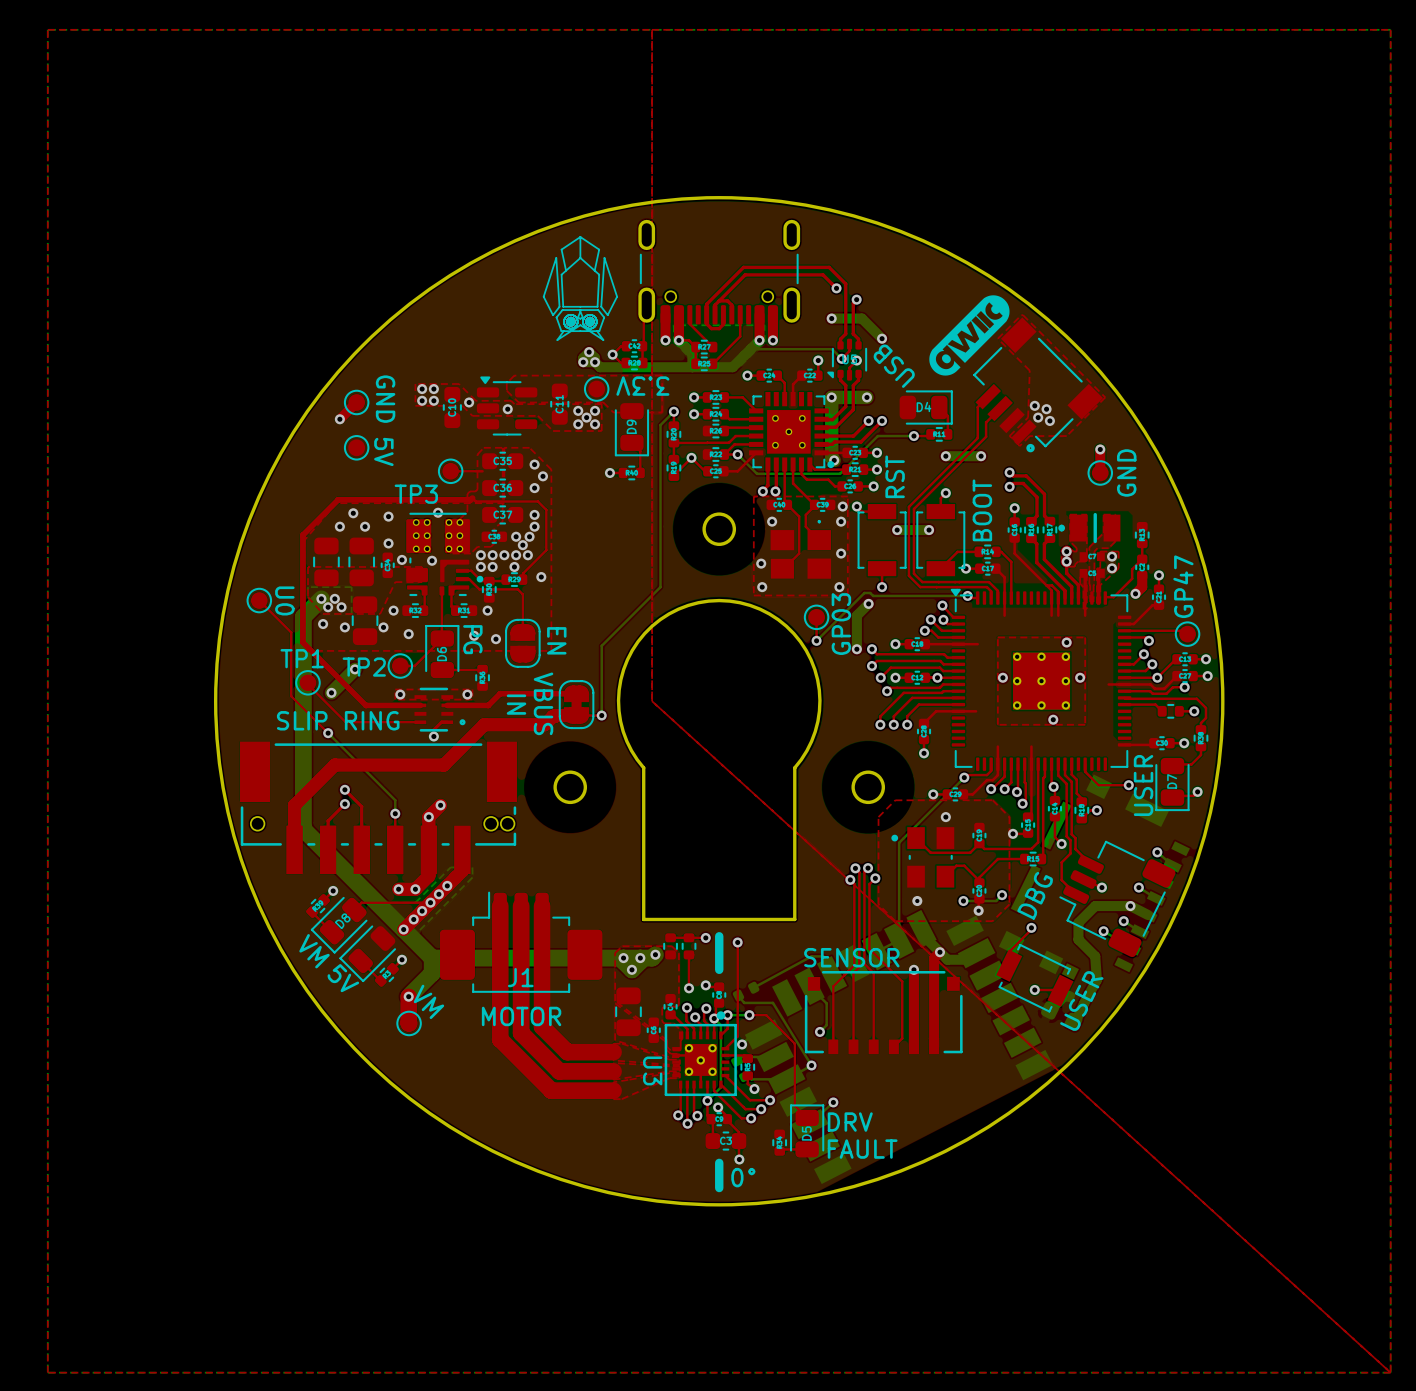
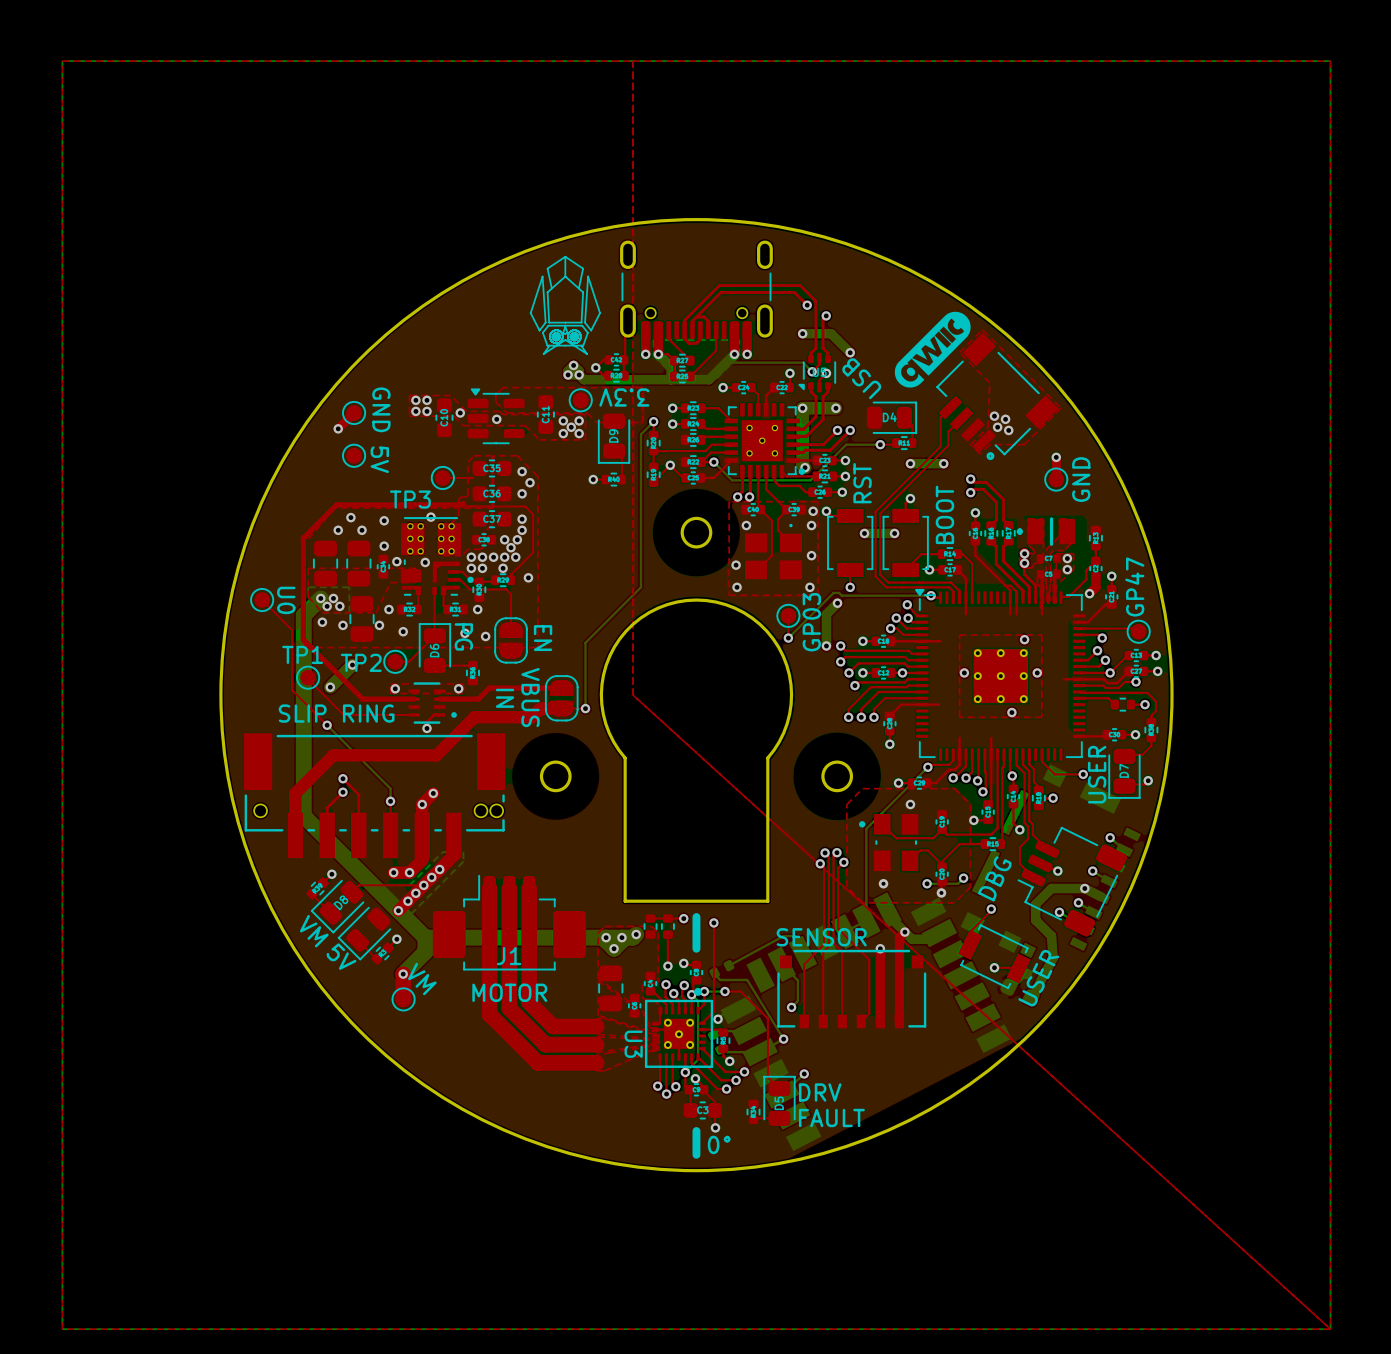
part footprint: [558, 680, 595, 730] -> [544, 675, 579, 722]

